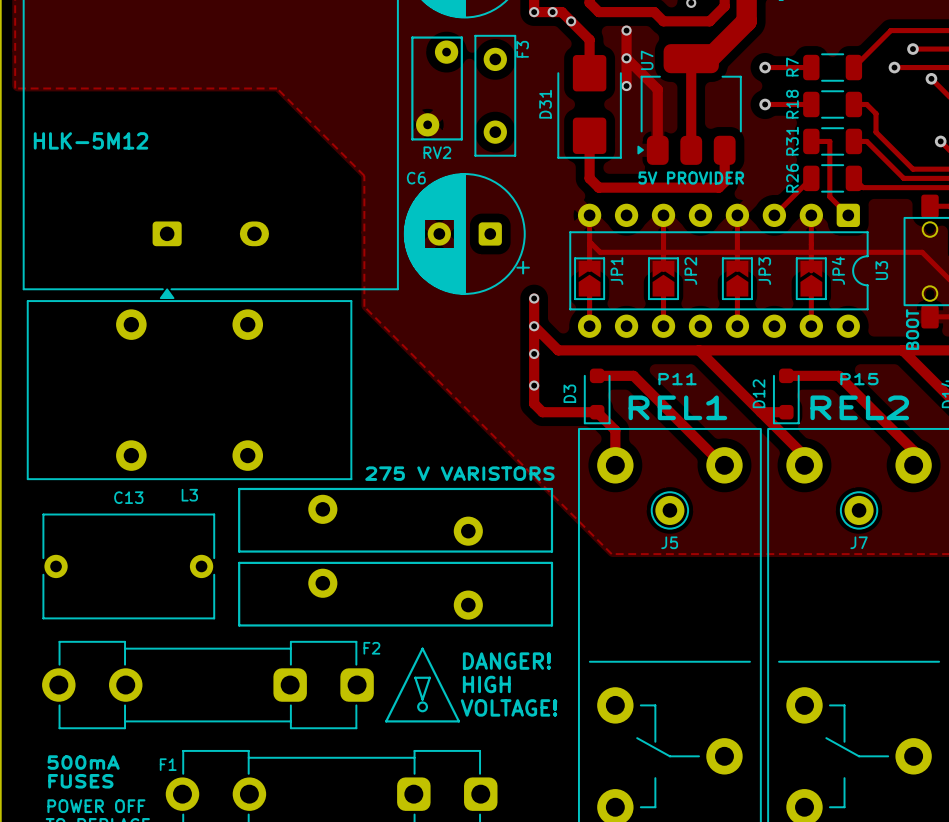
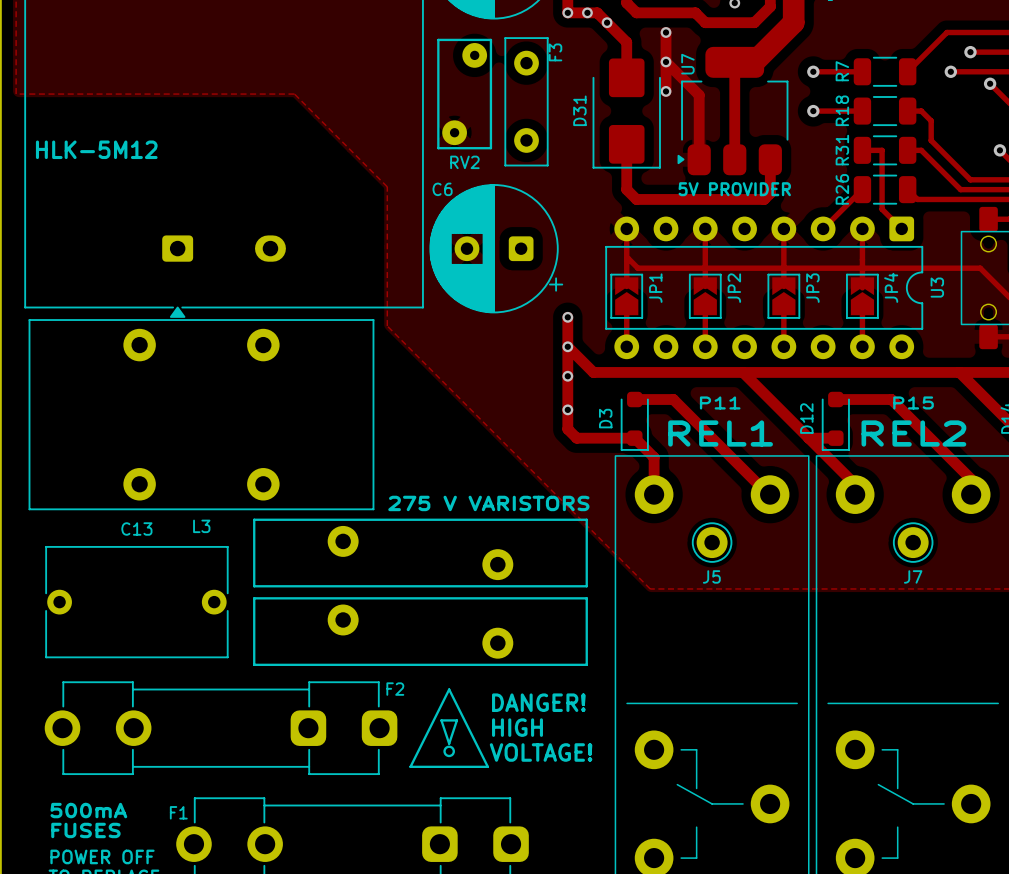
text: BOOT (912, 329) -> none

